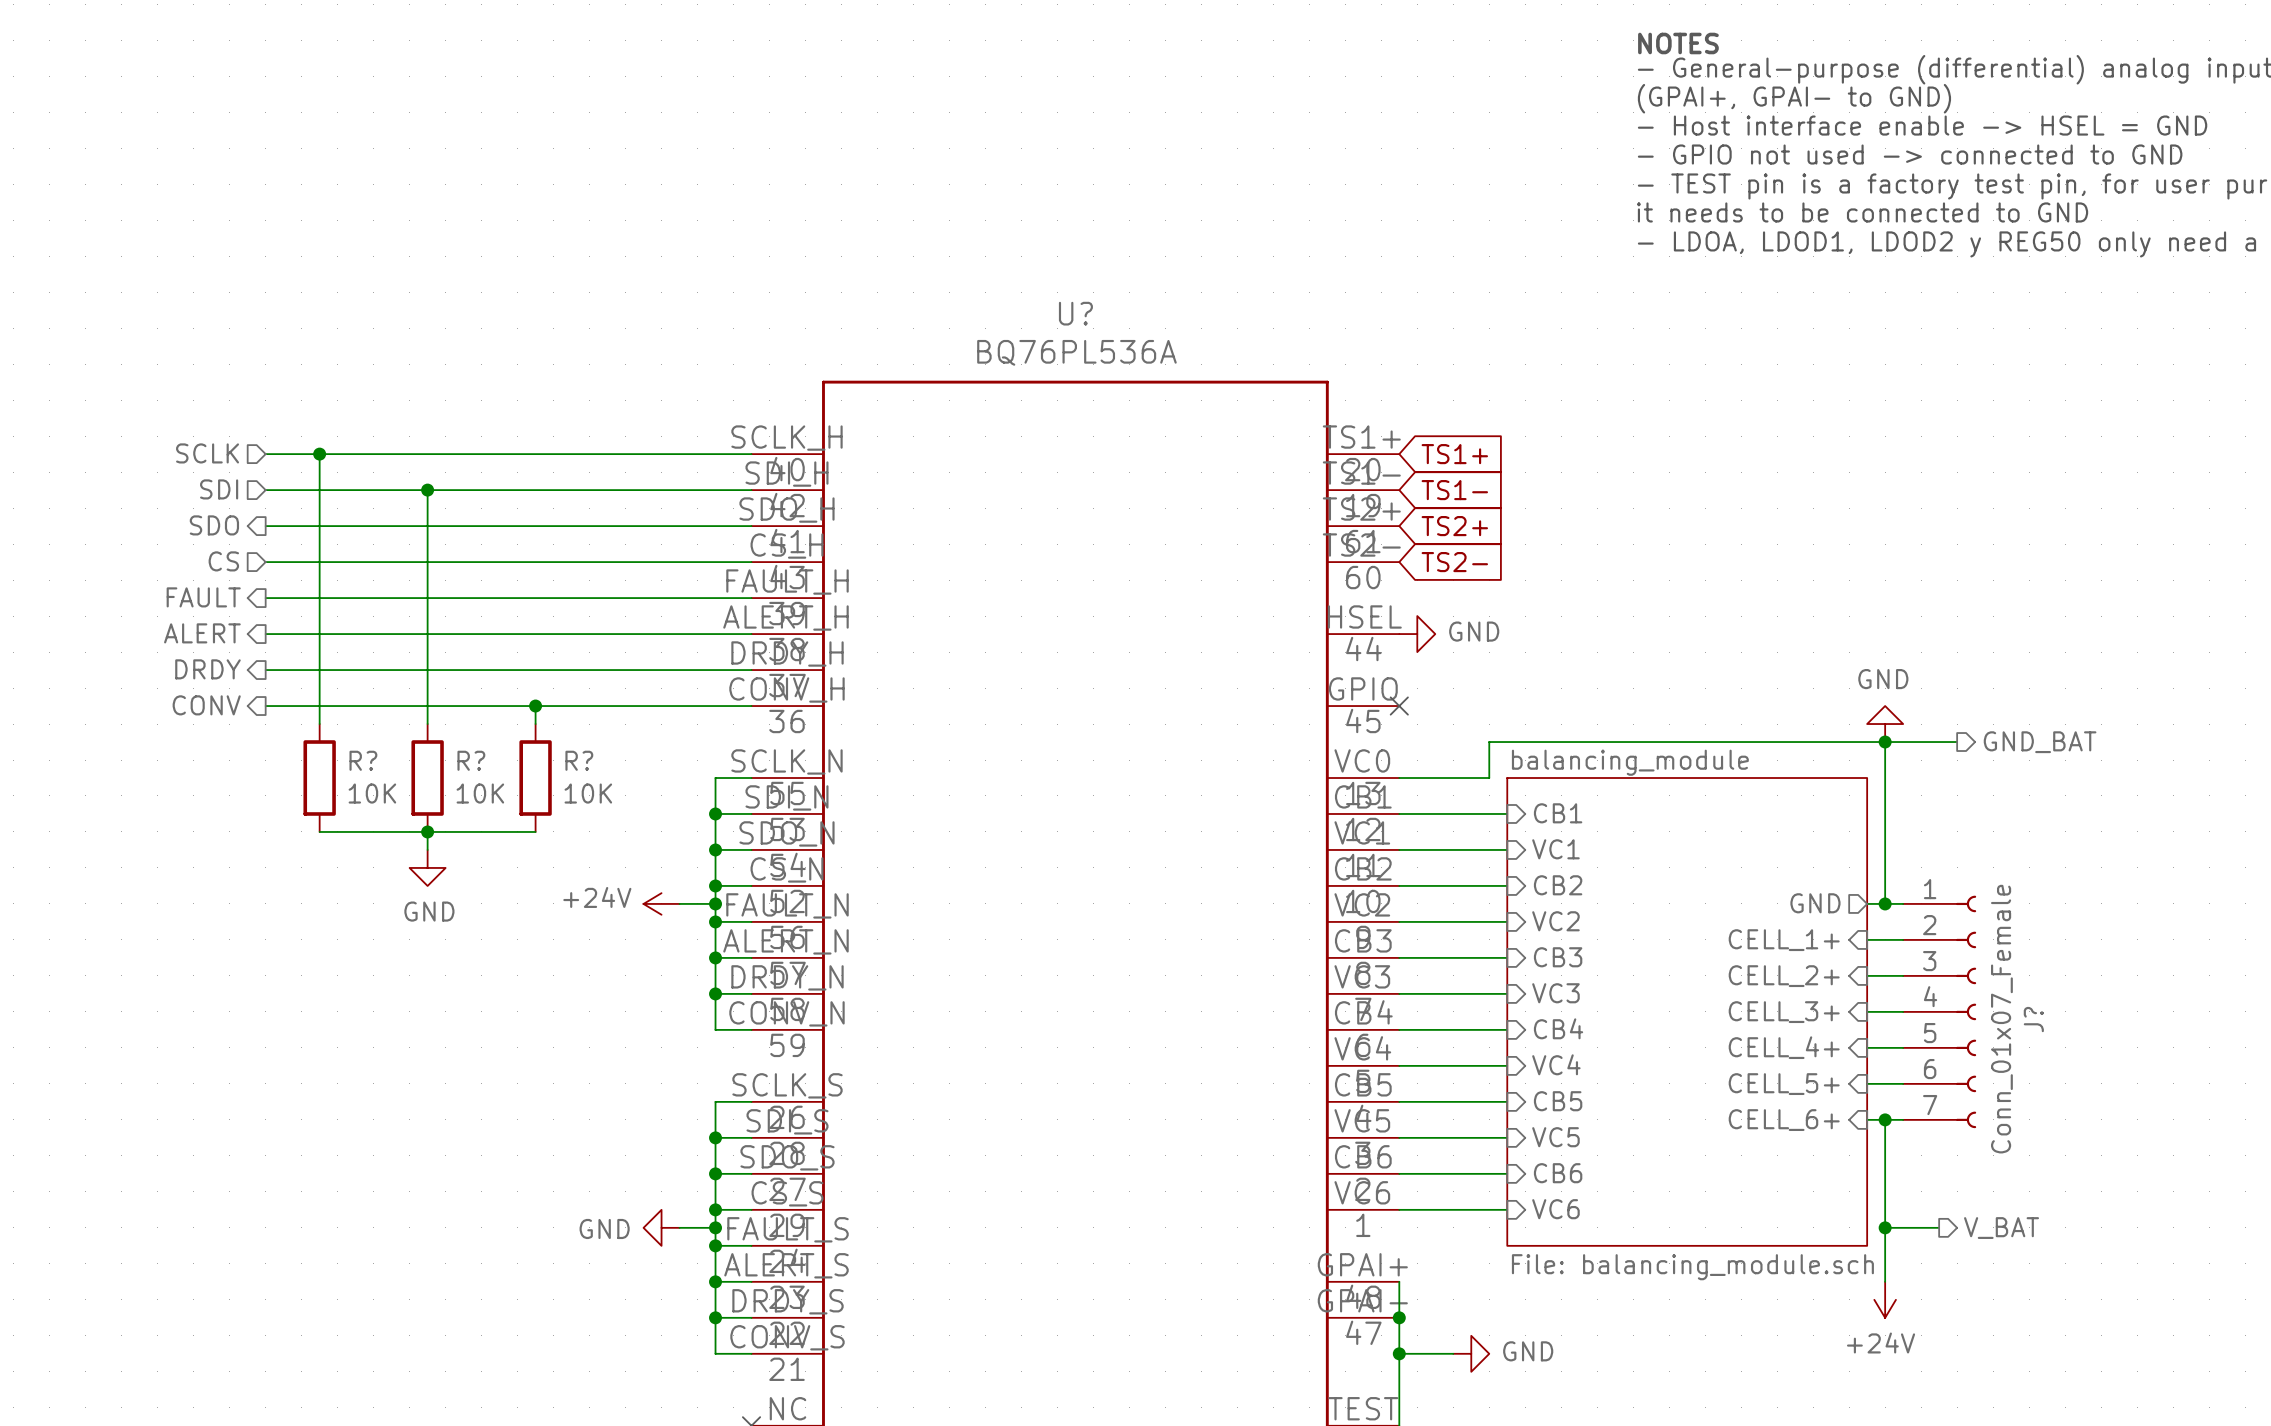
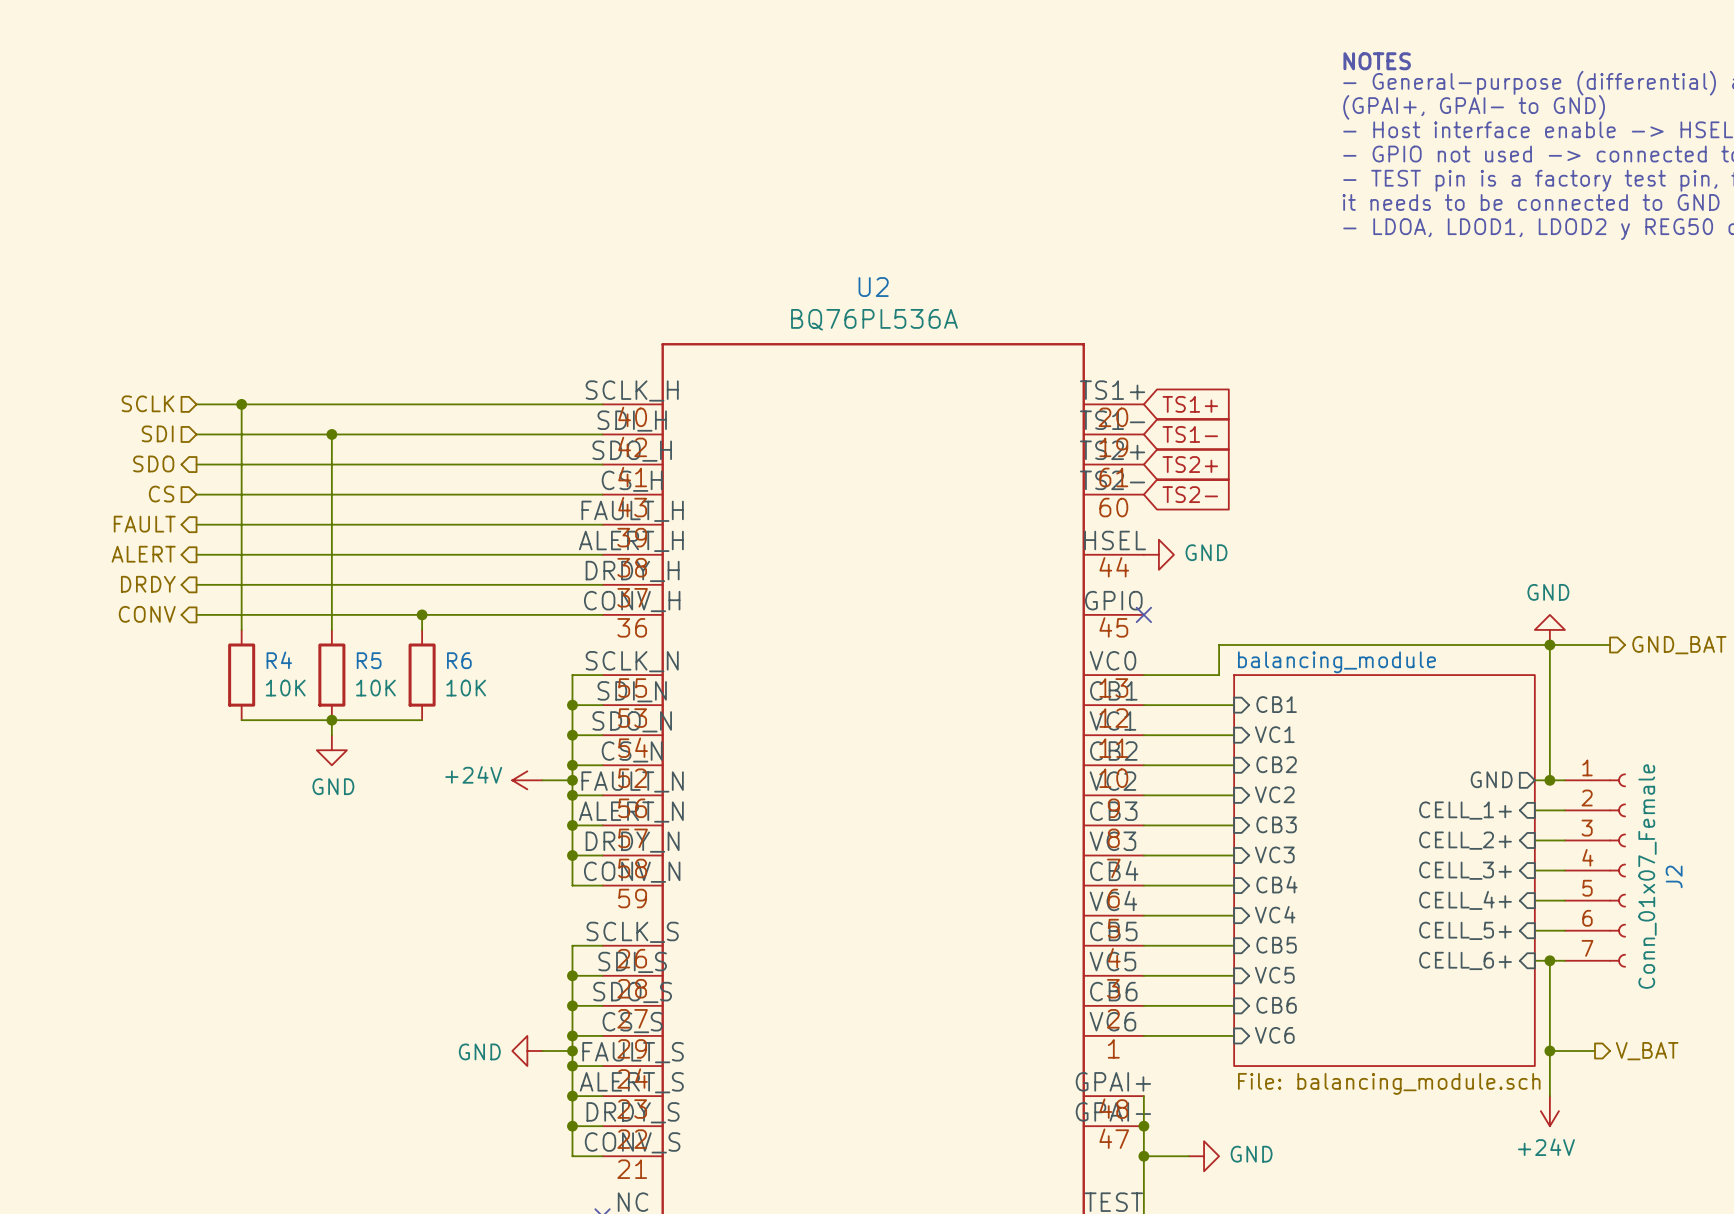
U? name: U? (1075, 313) -> U2 (873, 287)
R? name: R? (363, 760) -> R4 (279, 660)
R? name: R? (471, 760) -> R5 (369, 660)
R? name: R? (579, 760) -> R6 (459, 660)
J? name: J? (2033, 1019) -> J2 (1674, 876)

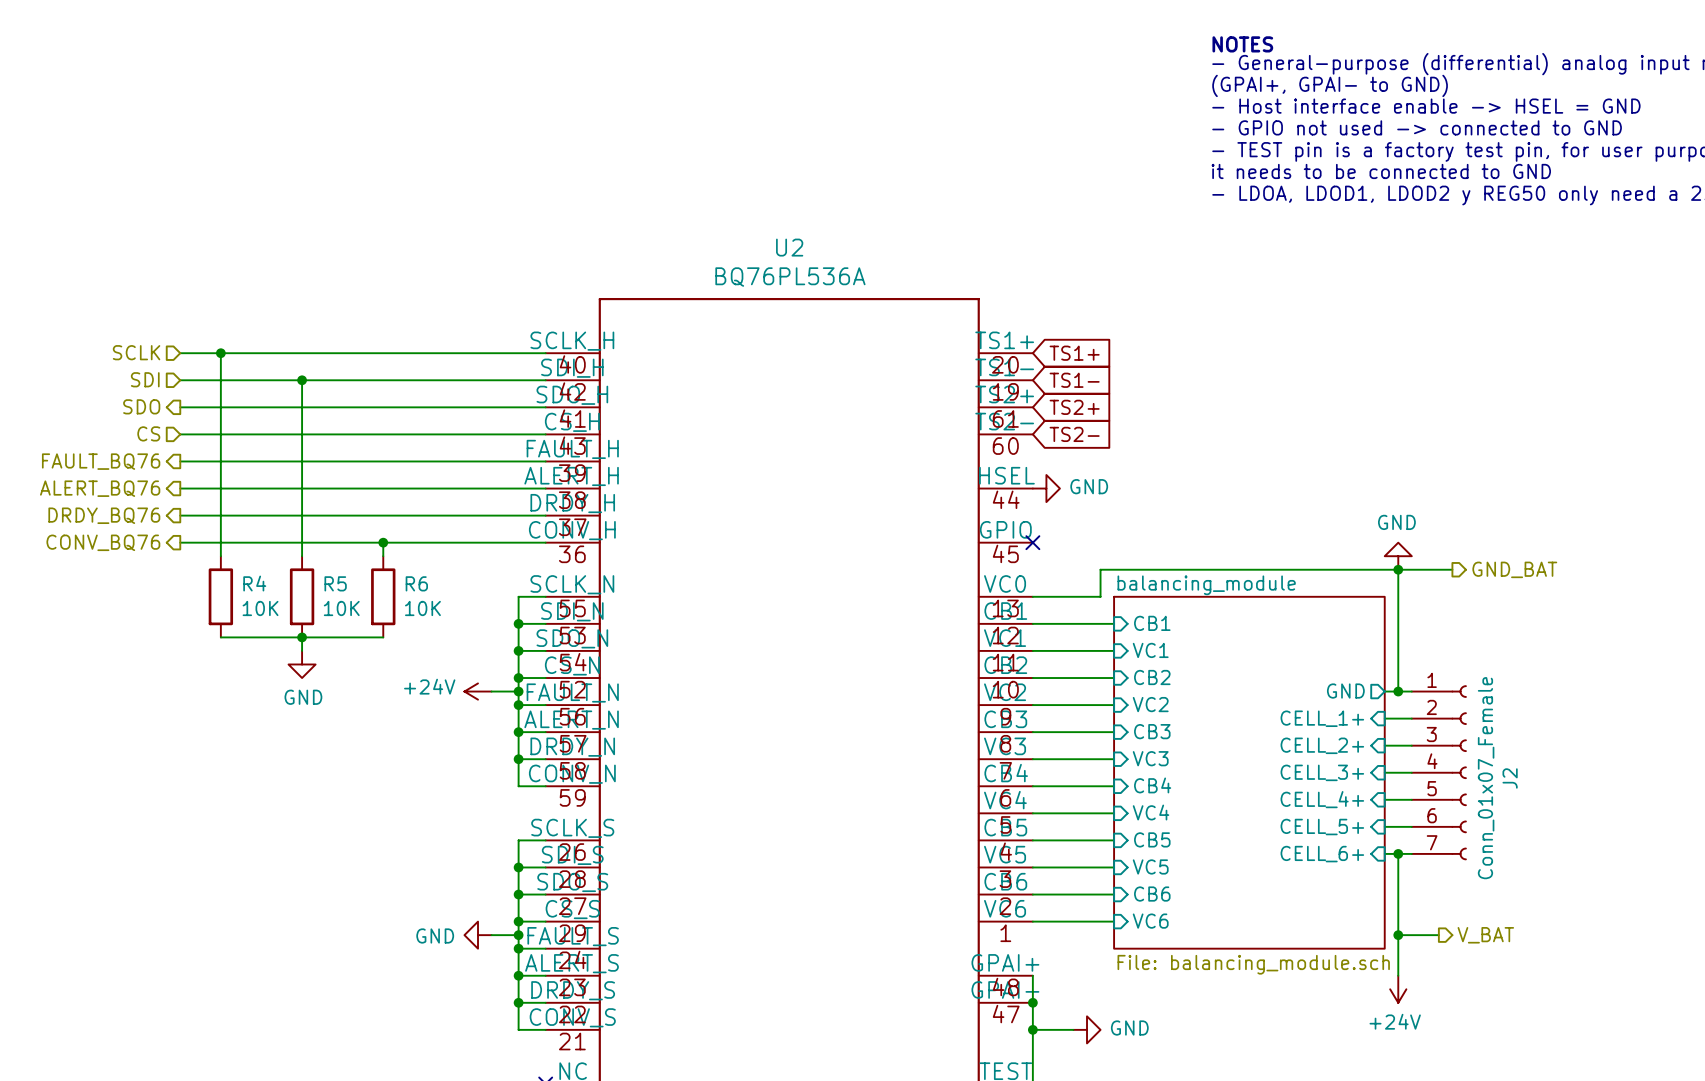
hierarchical label: FAULT (144, 524) -> FAULT_BQ76 (101, 461)
hierarchical label: ALERT (143, 554) -> ALERT_BQ76 (100, 488)
hierarchical label: DRDY (148, 584) -> DRDY_BQ76 (104, 515)
hierarchical label: CONV (147, 614) -> CONV_BQ76 (103, 542)

